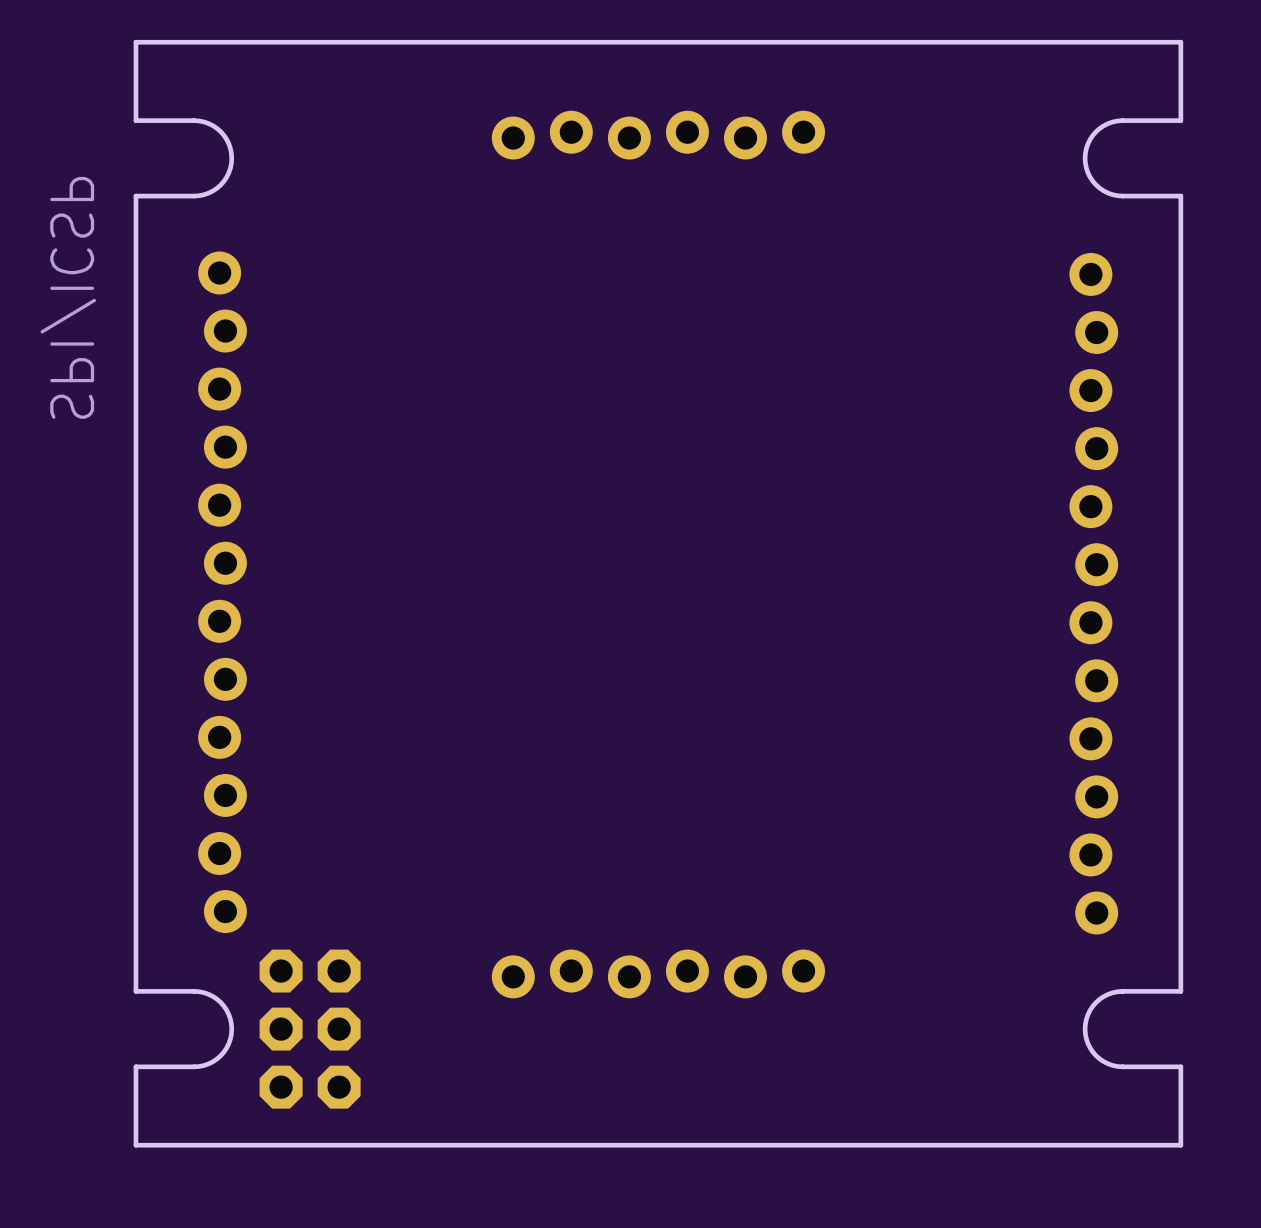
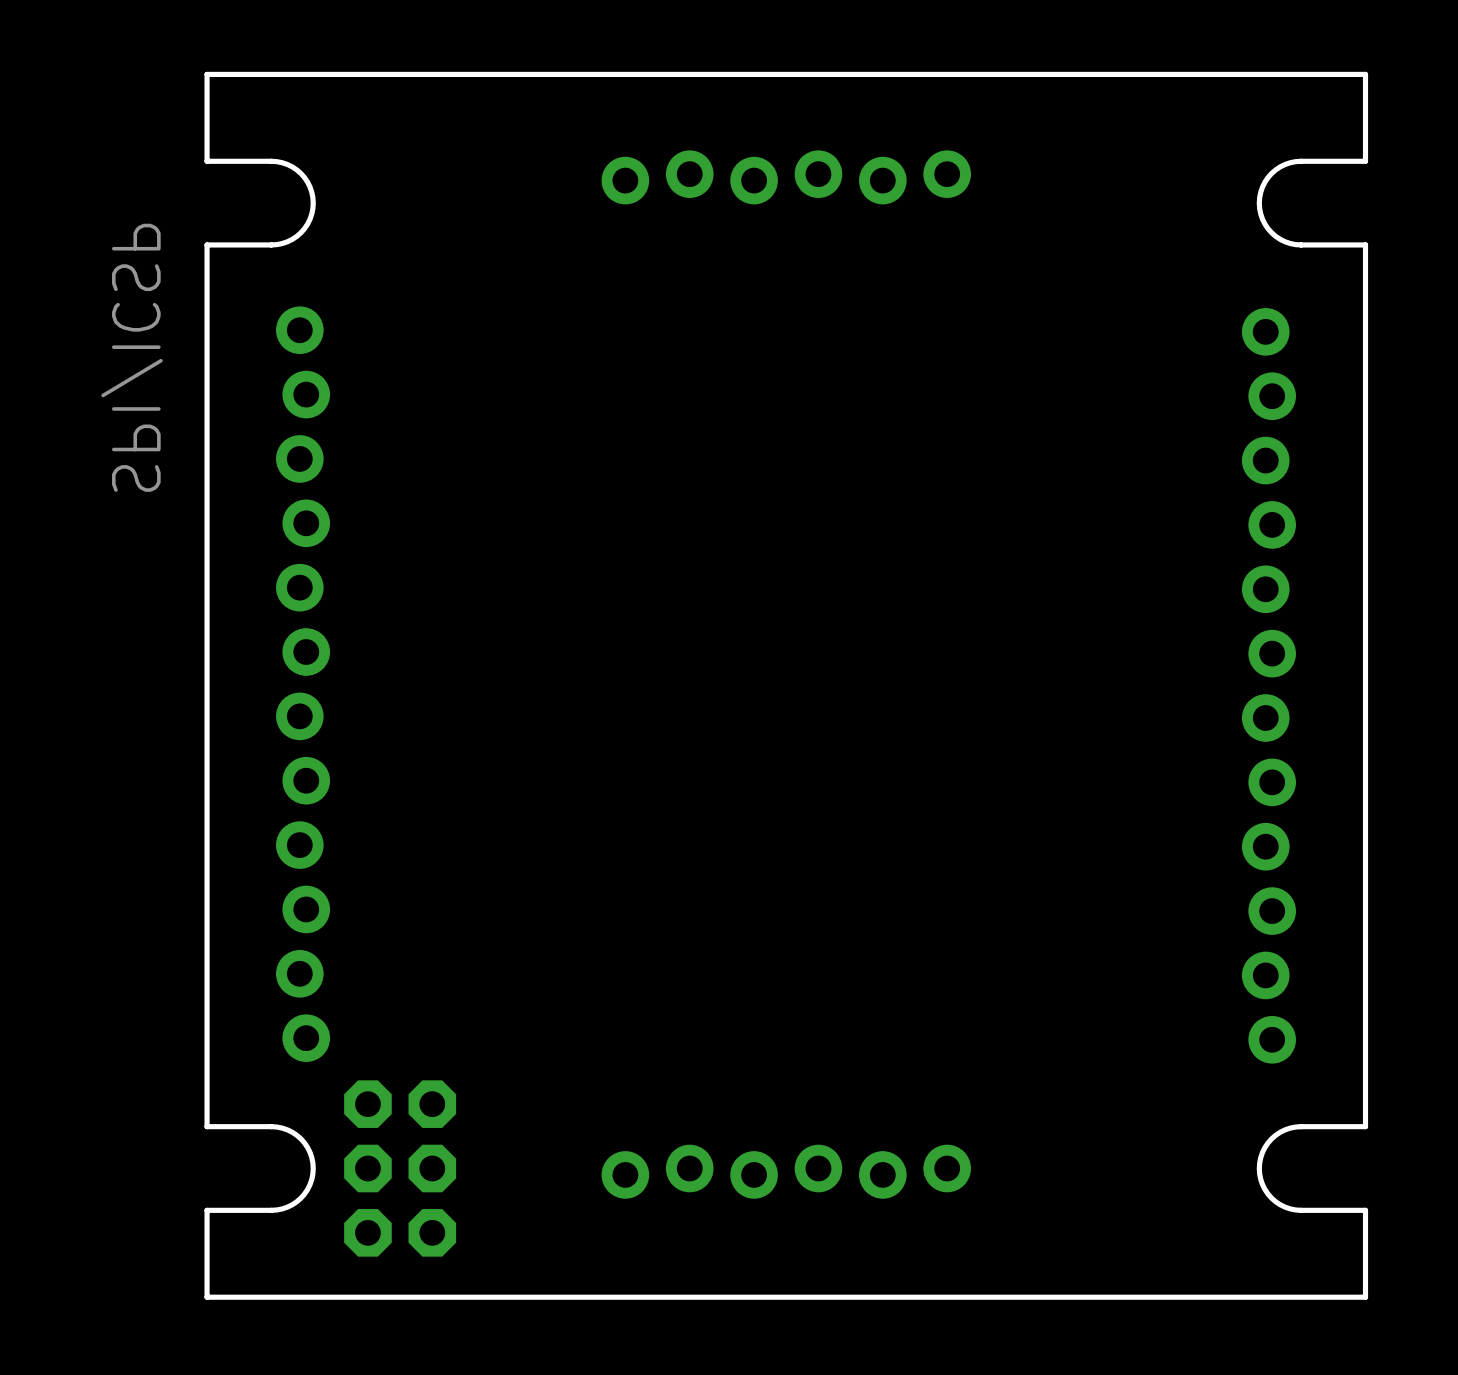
part position: (658, 973) -> (786, 1171)

